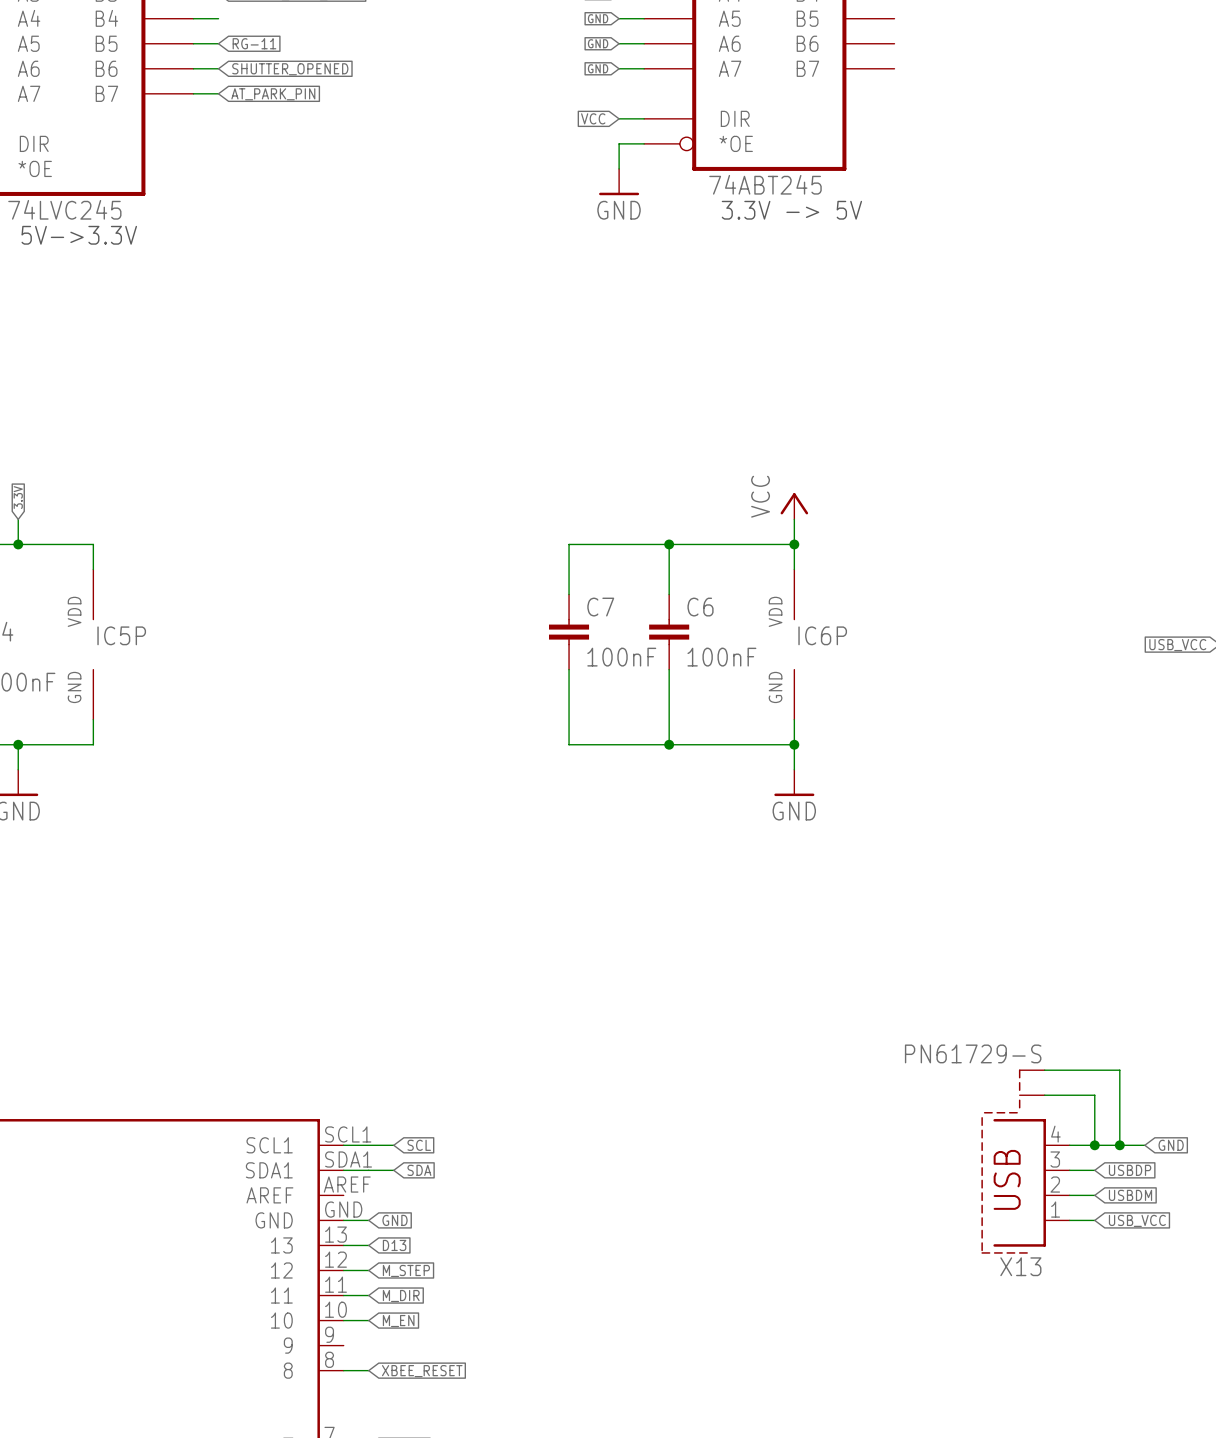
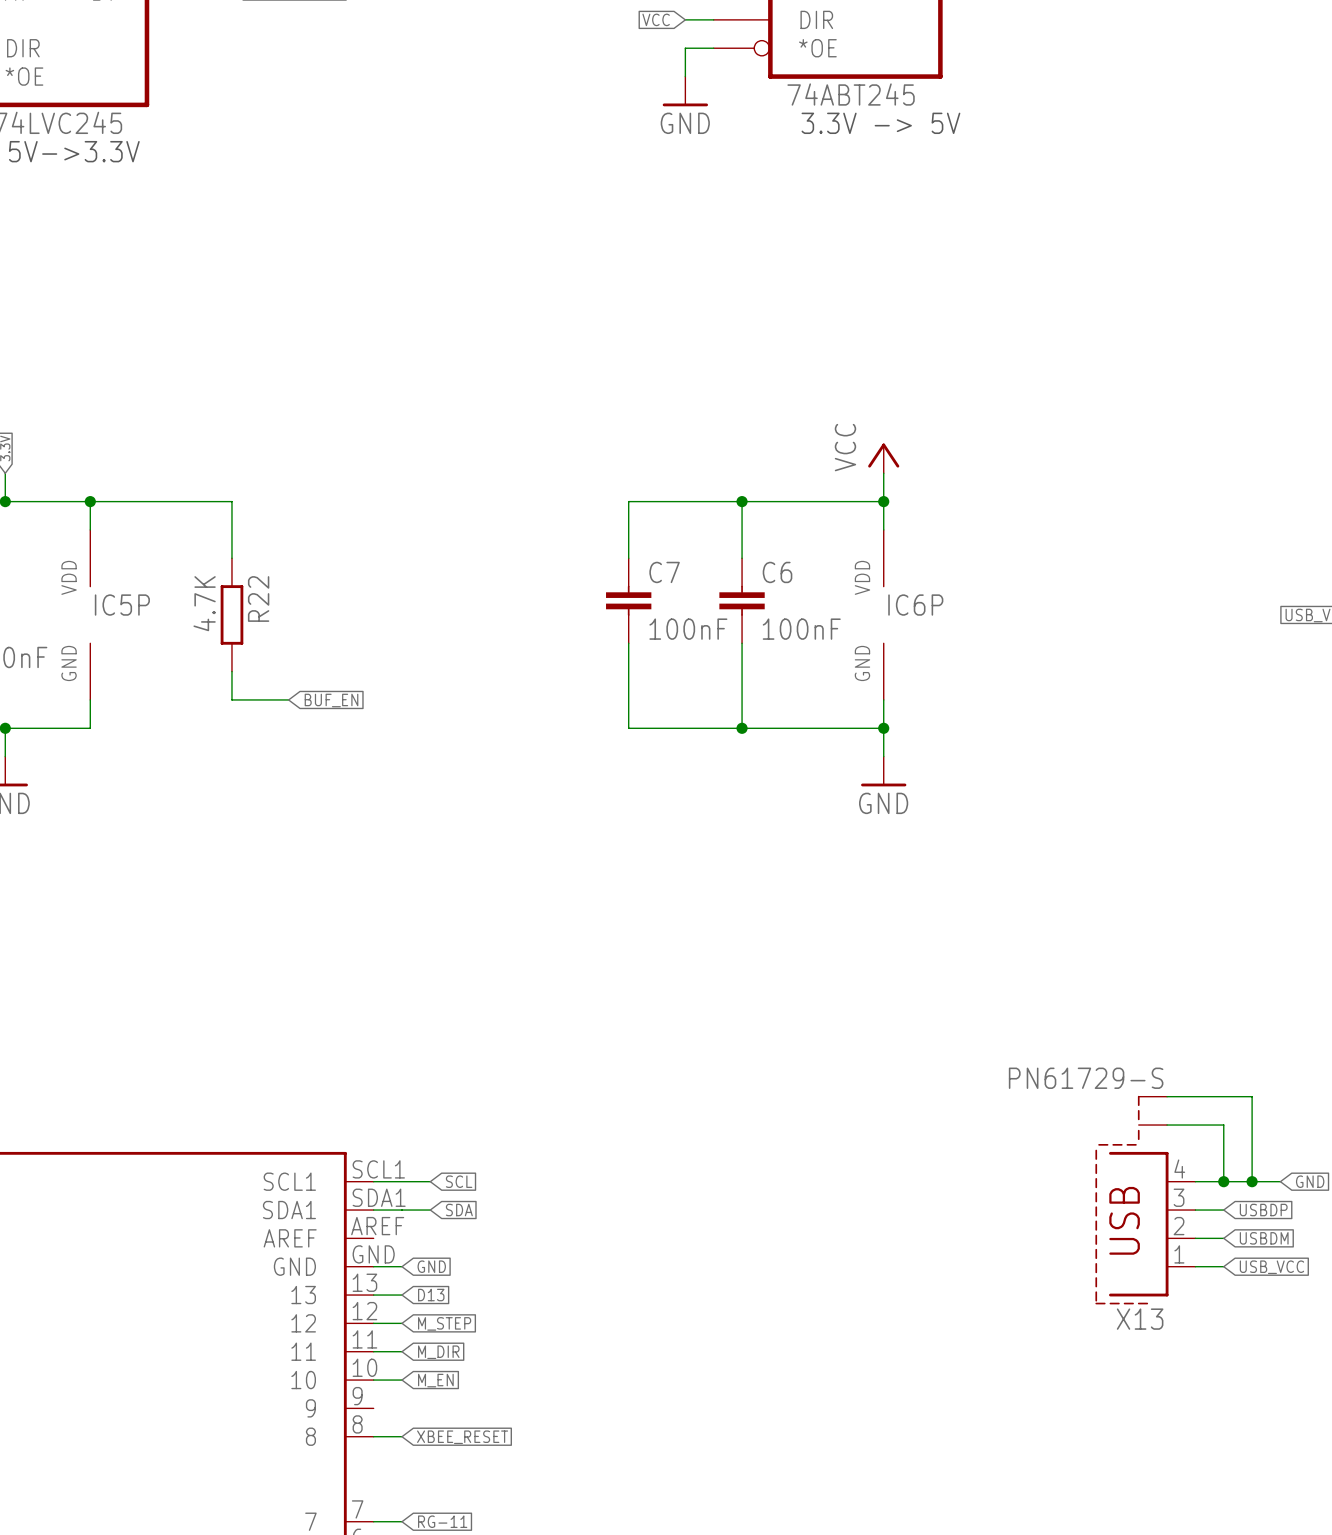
wire: none -> (90, 501) (231, 501) (231, 558)
junction: none -> (90, 501)
R22: none -> 4.7K (231, 614)
wire: none -> (231, 671) (231, 699) (288, 699)
global label: none -> BUF_EN (331, 700)

